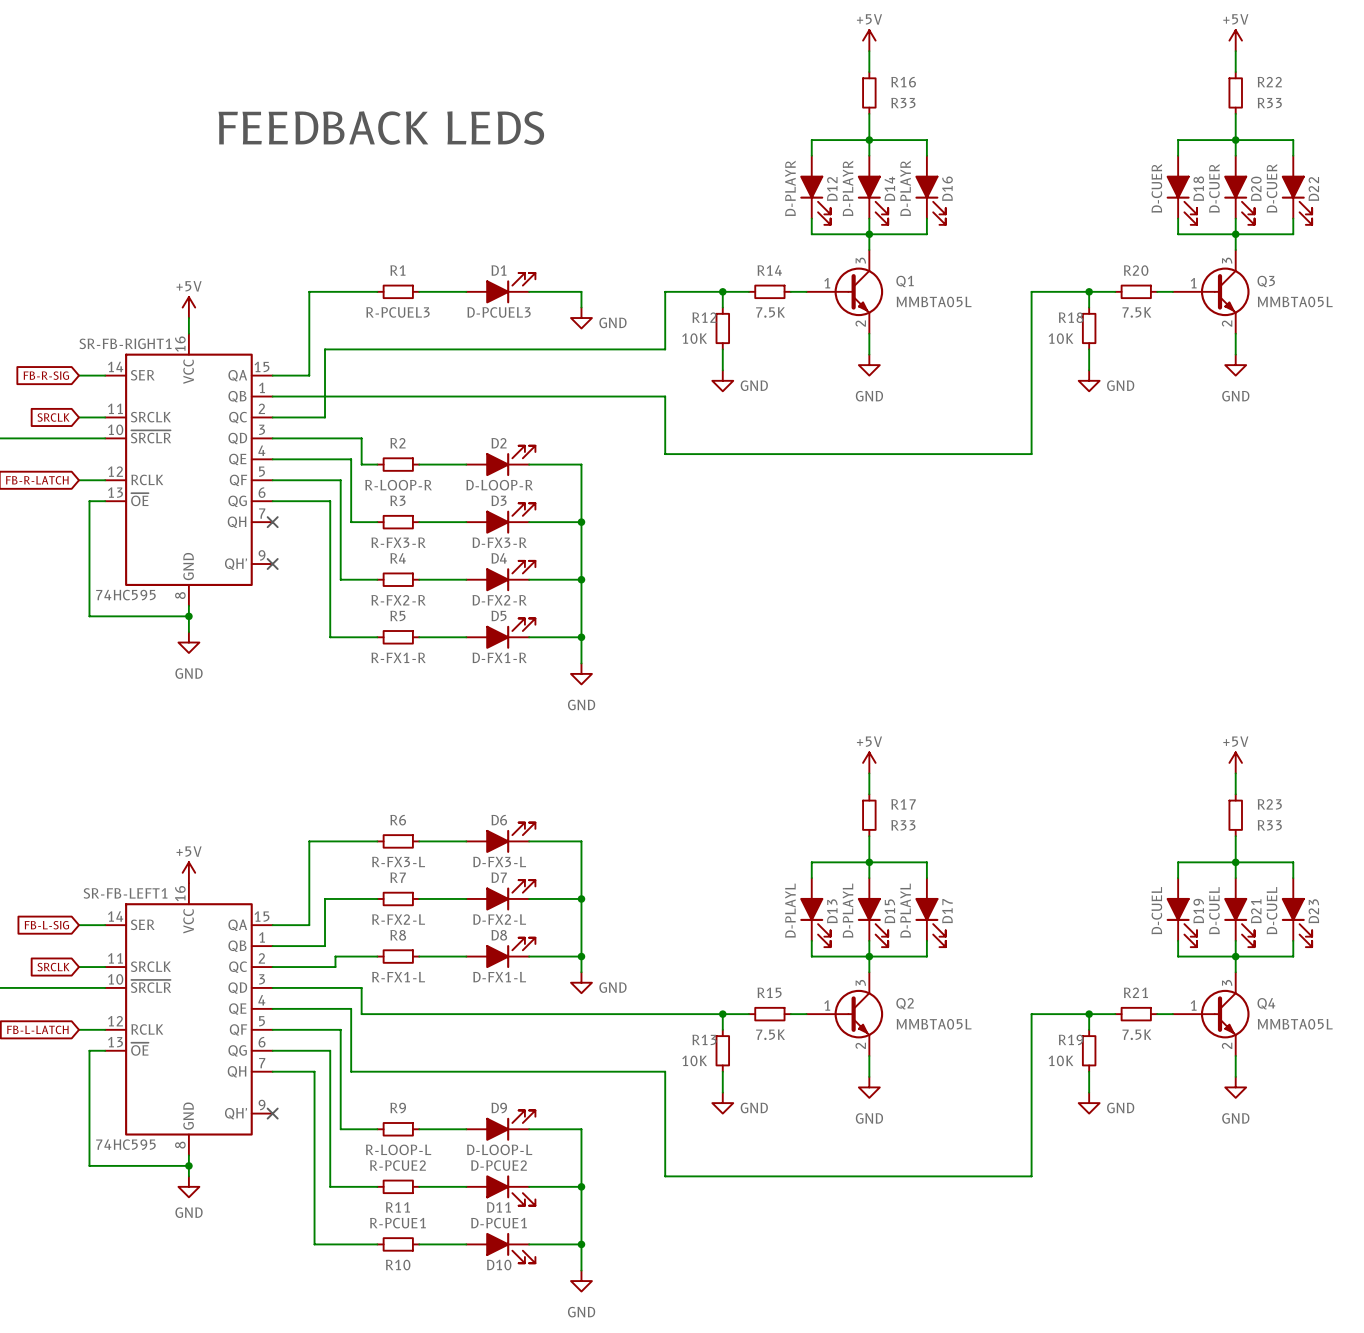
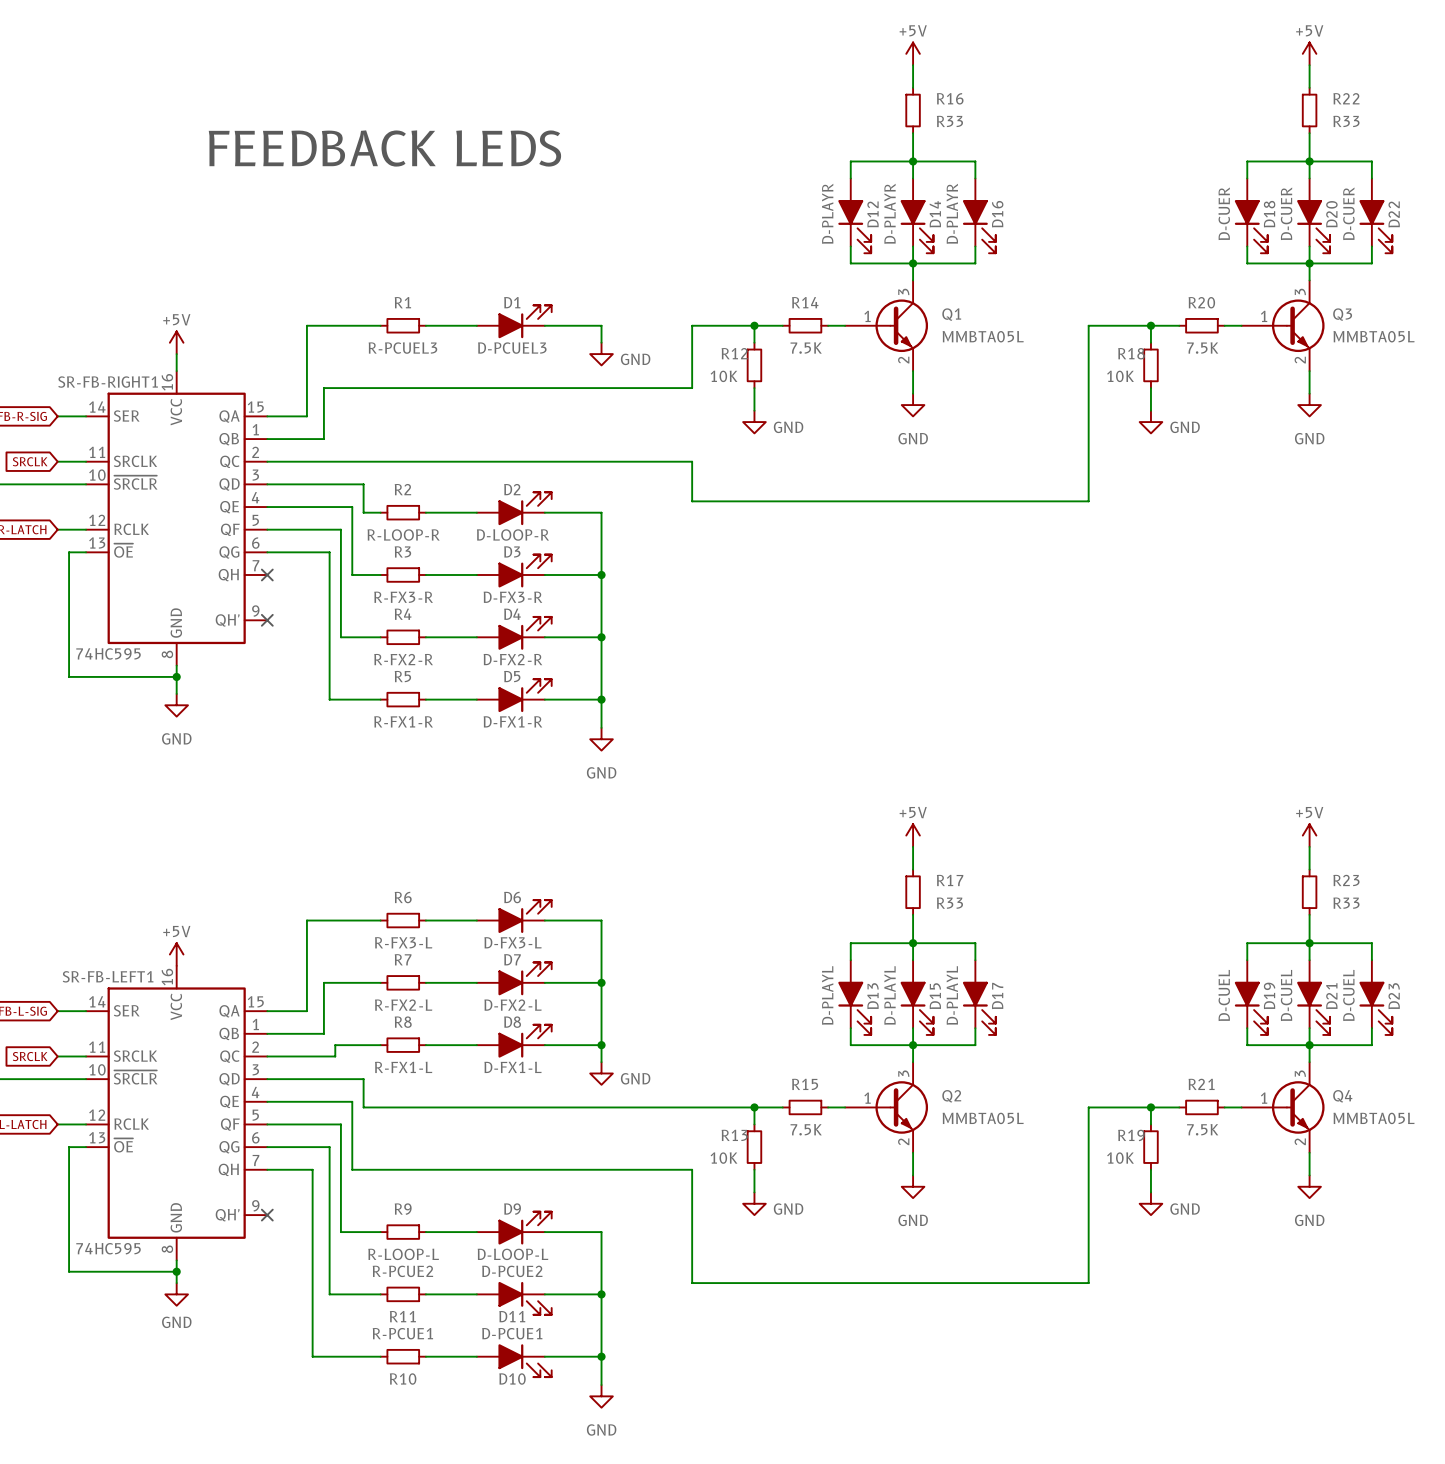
wire: (325, 417) (325, 396) (665, 396) (665, 417) -> (323, 461) (692, 461)

